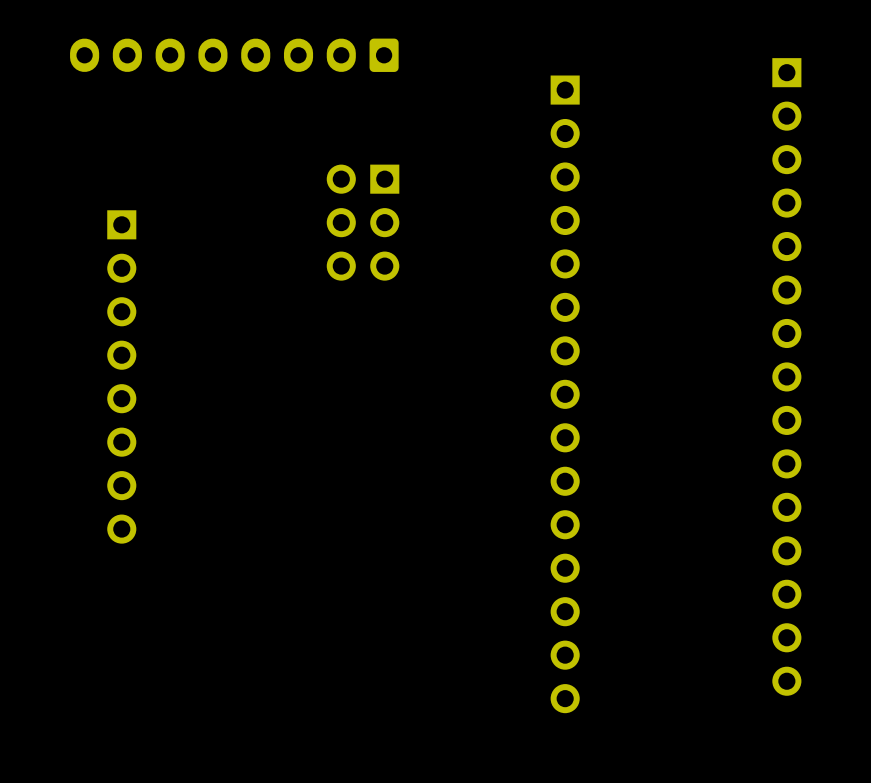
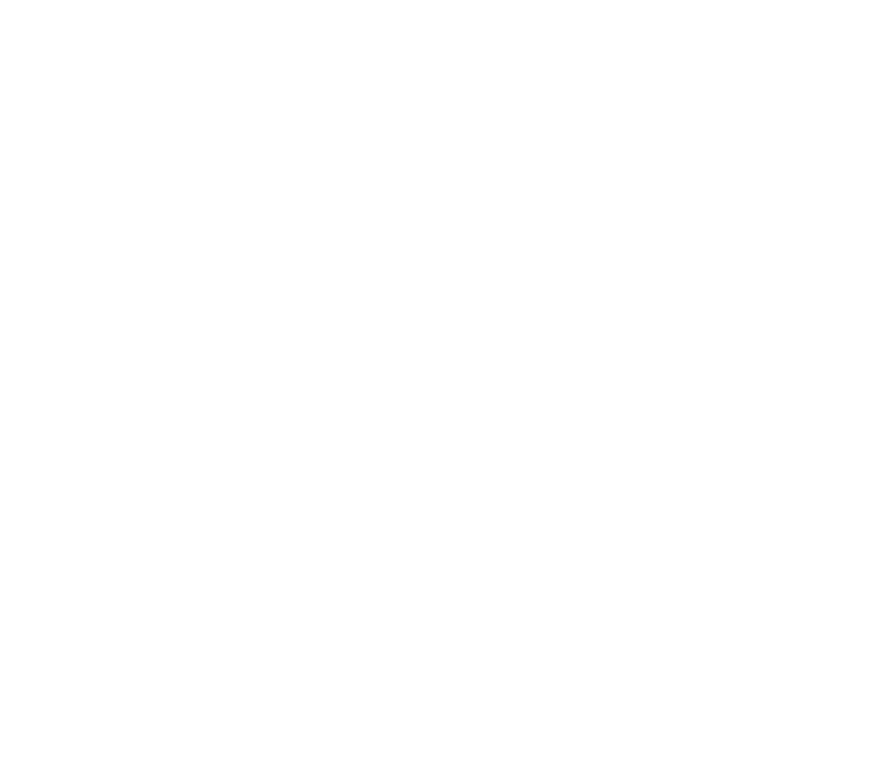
part: (234, 55) -> none
part: (363, 222) -> none
part: (121, 376) -> none
part: (786, 376) -> none
part: (565, 394) -> none

